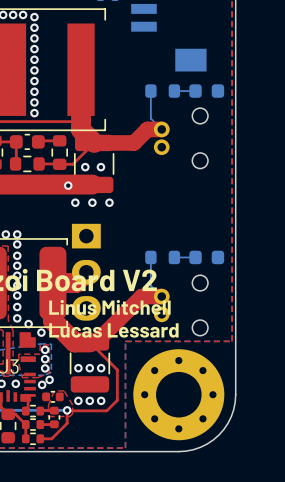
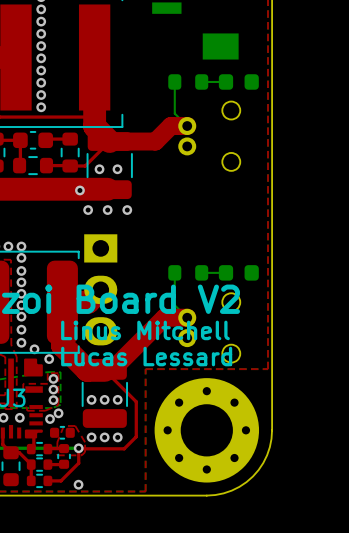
via: none -> (78, 484)

